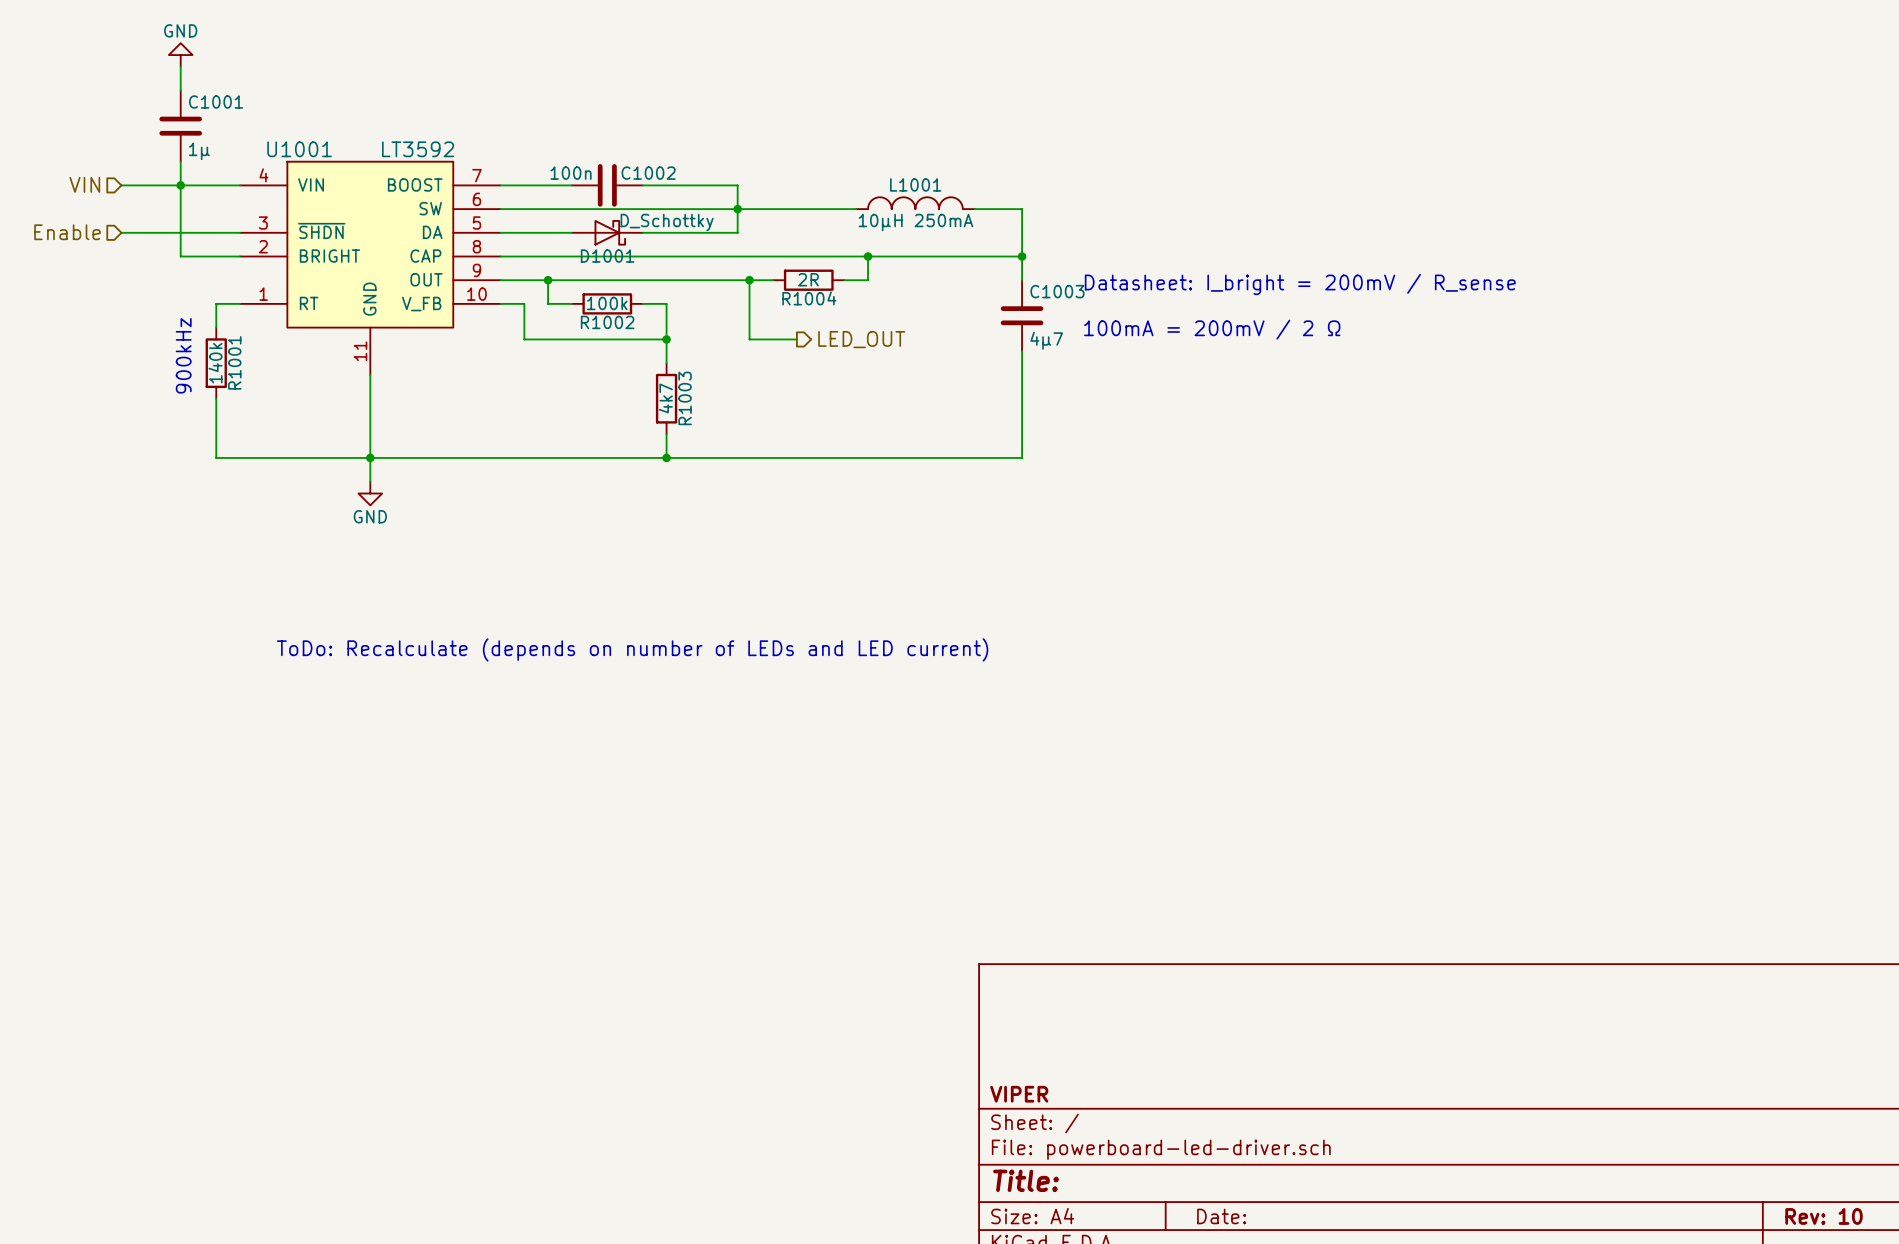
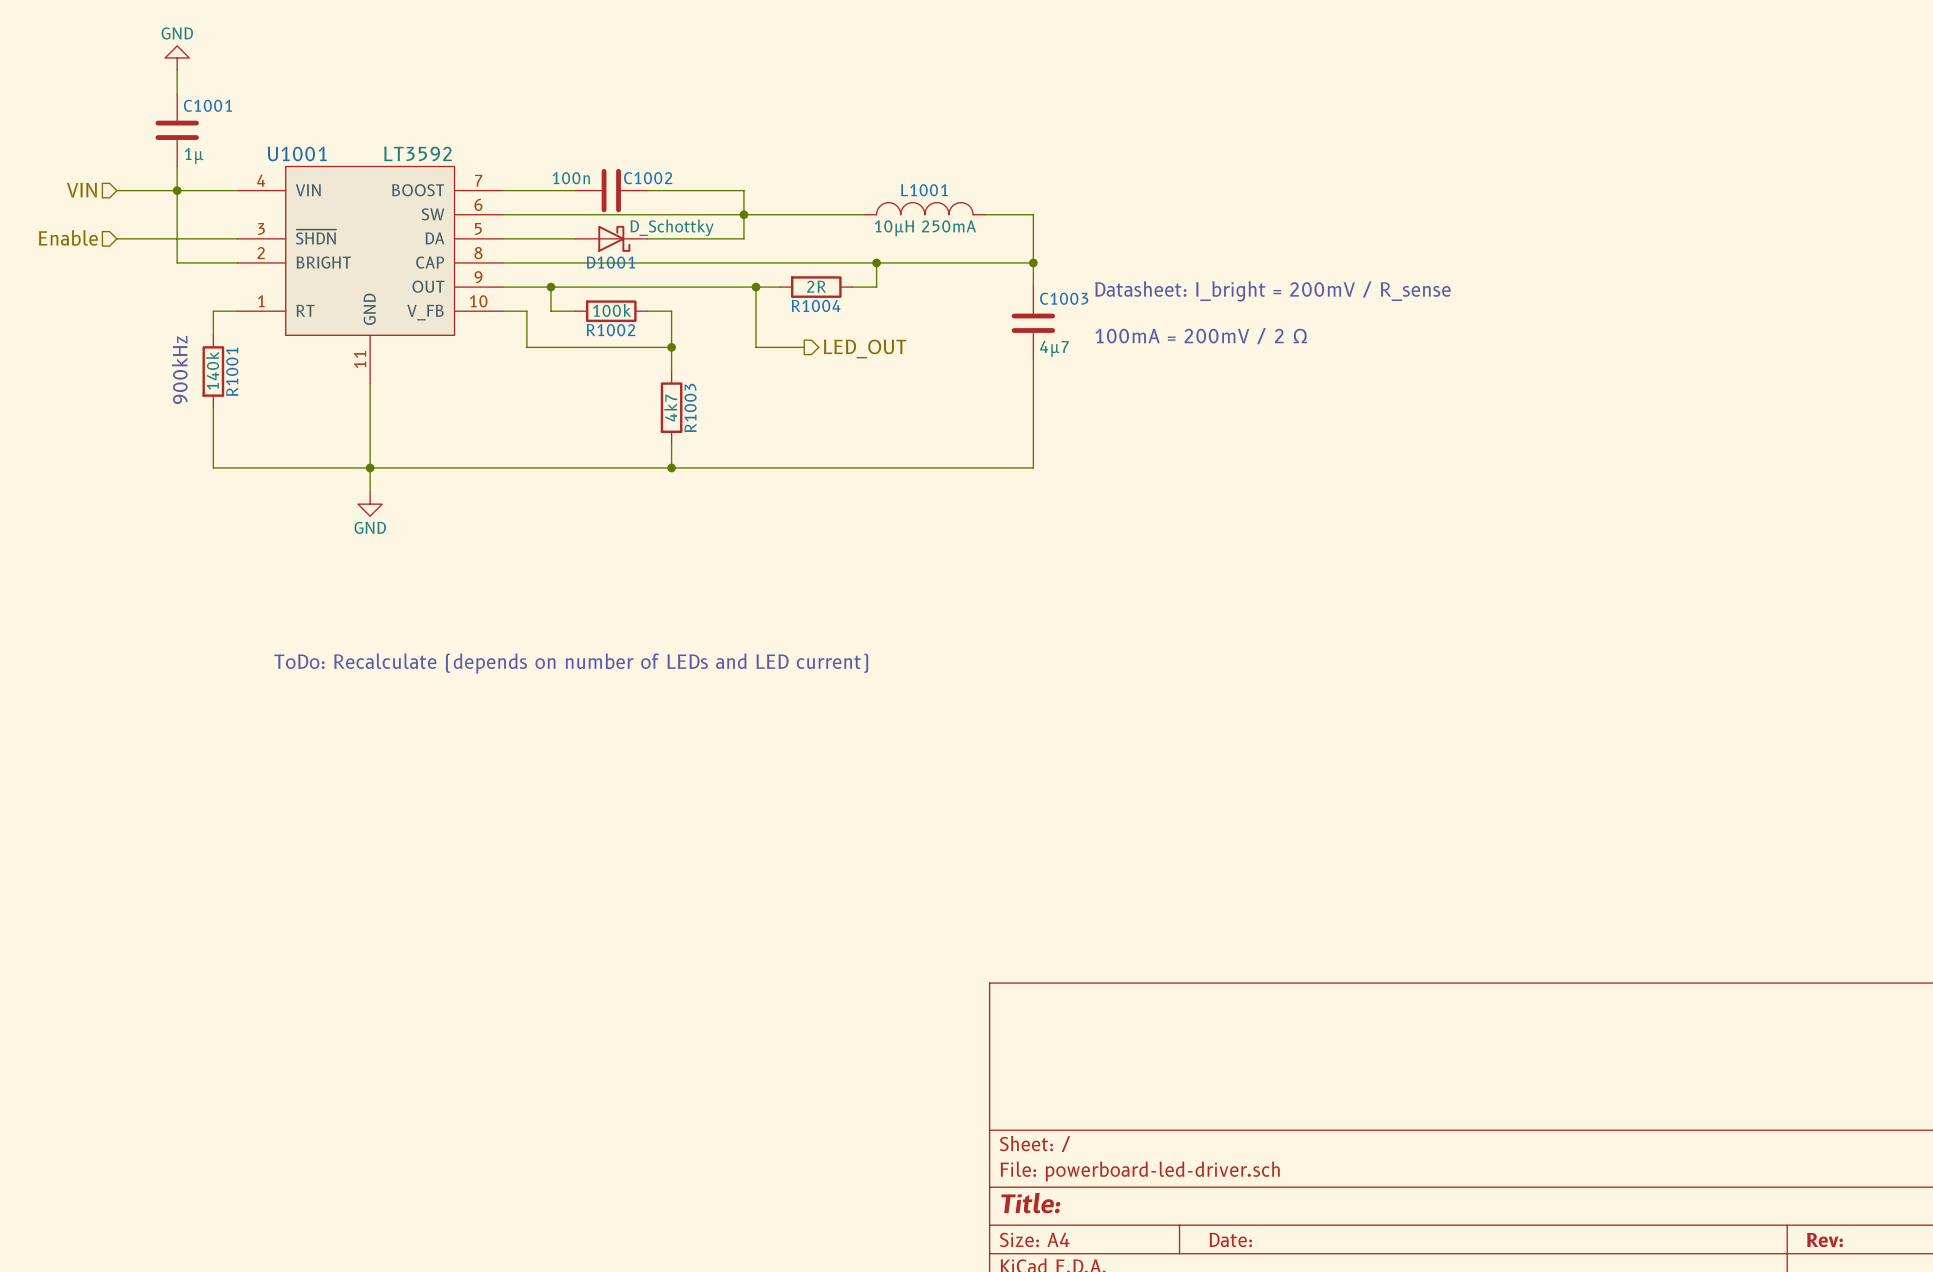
title block: VIPER (1019, 1094) -> none
title block: Rev: 10 (1824, 1216) -> Rev: (1824, 1240)

